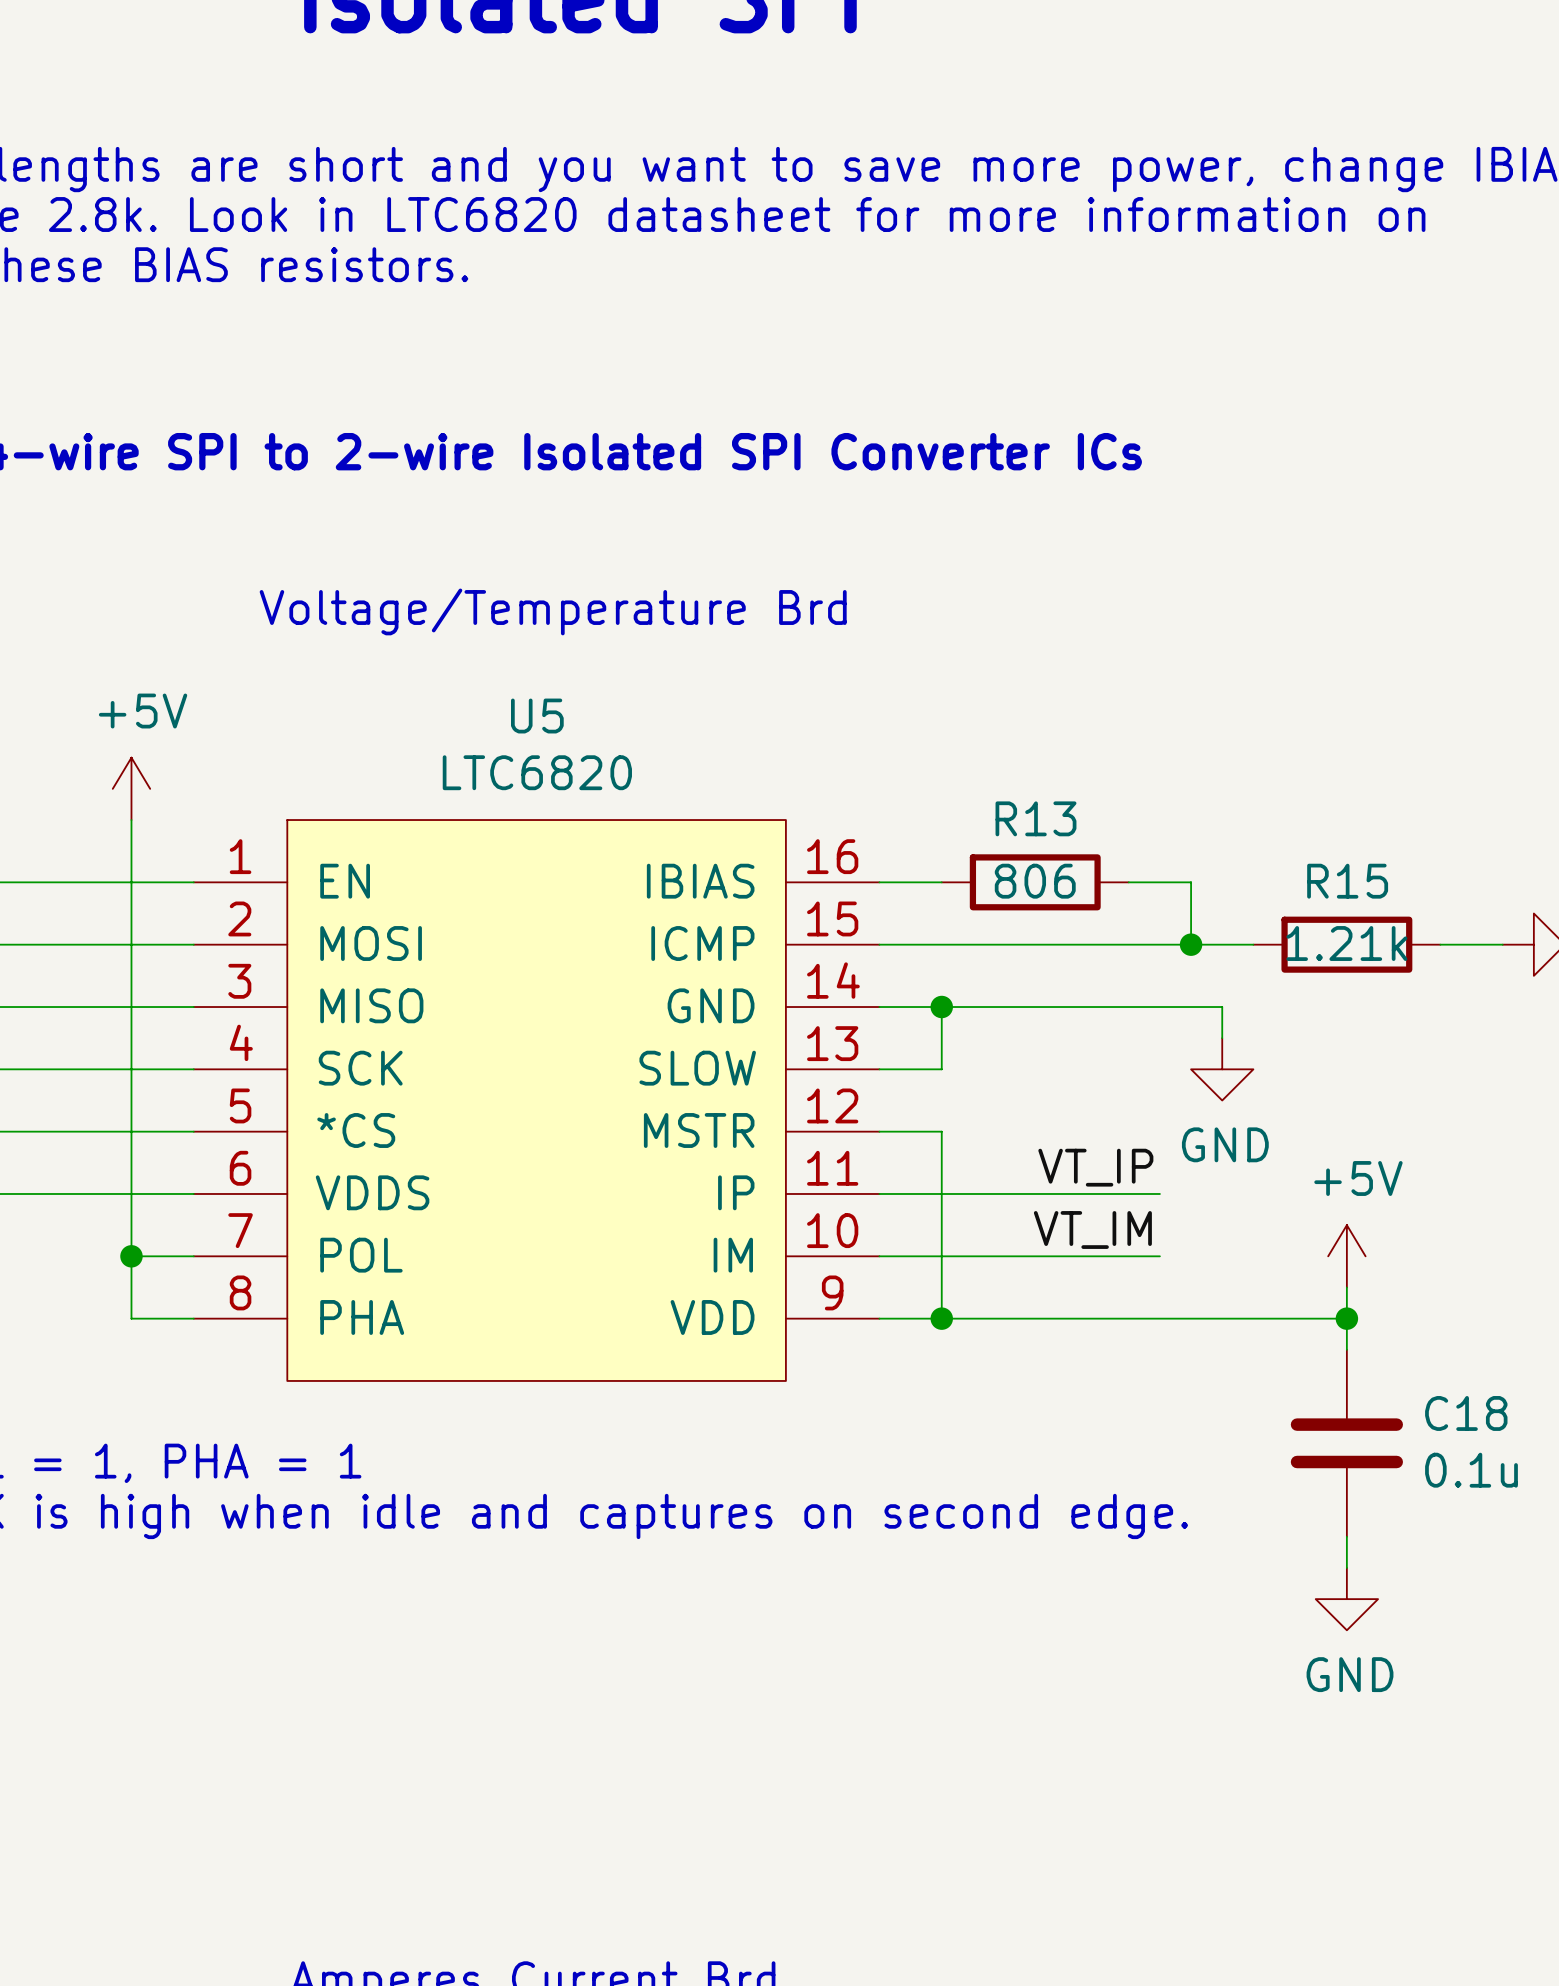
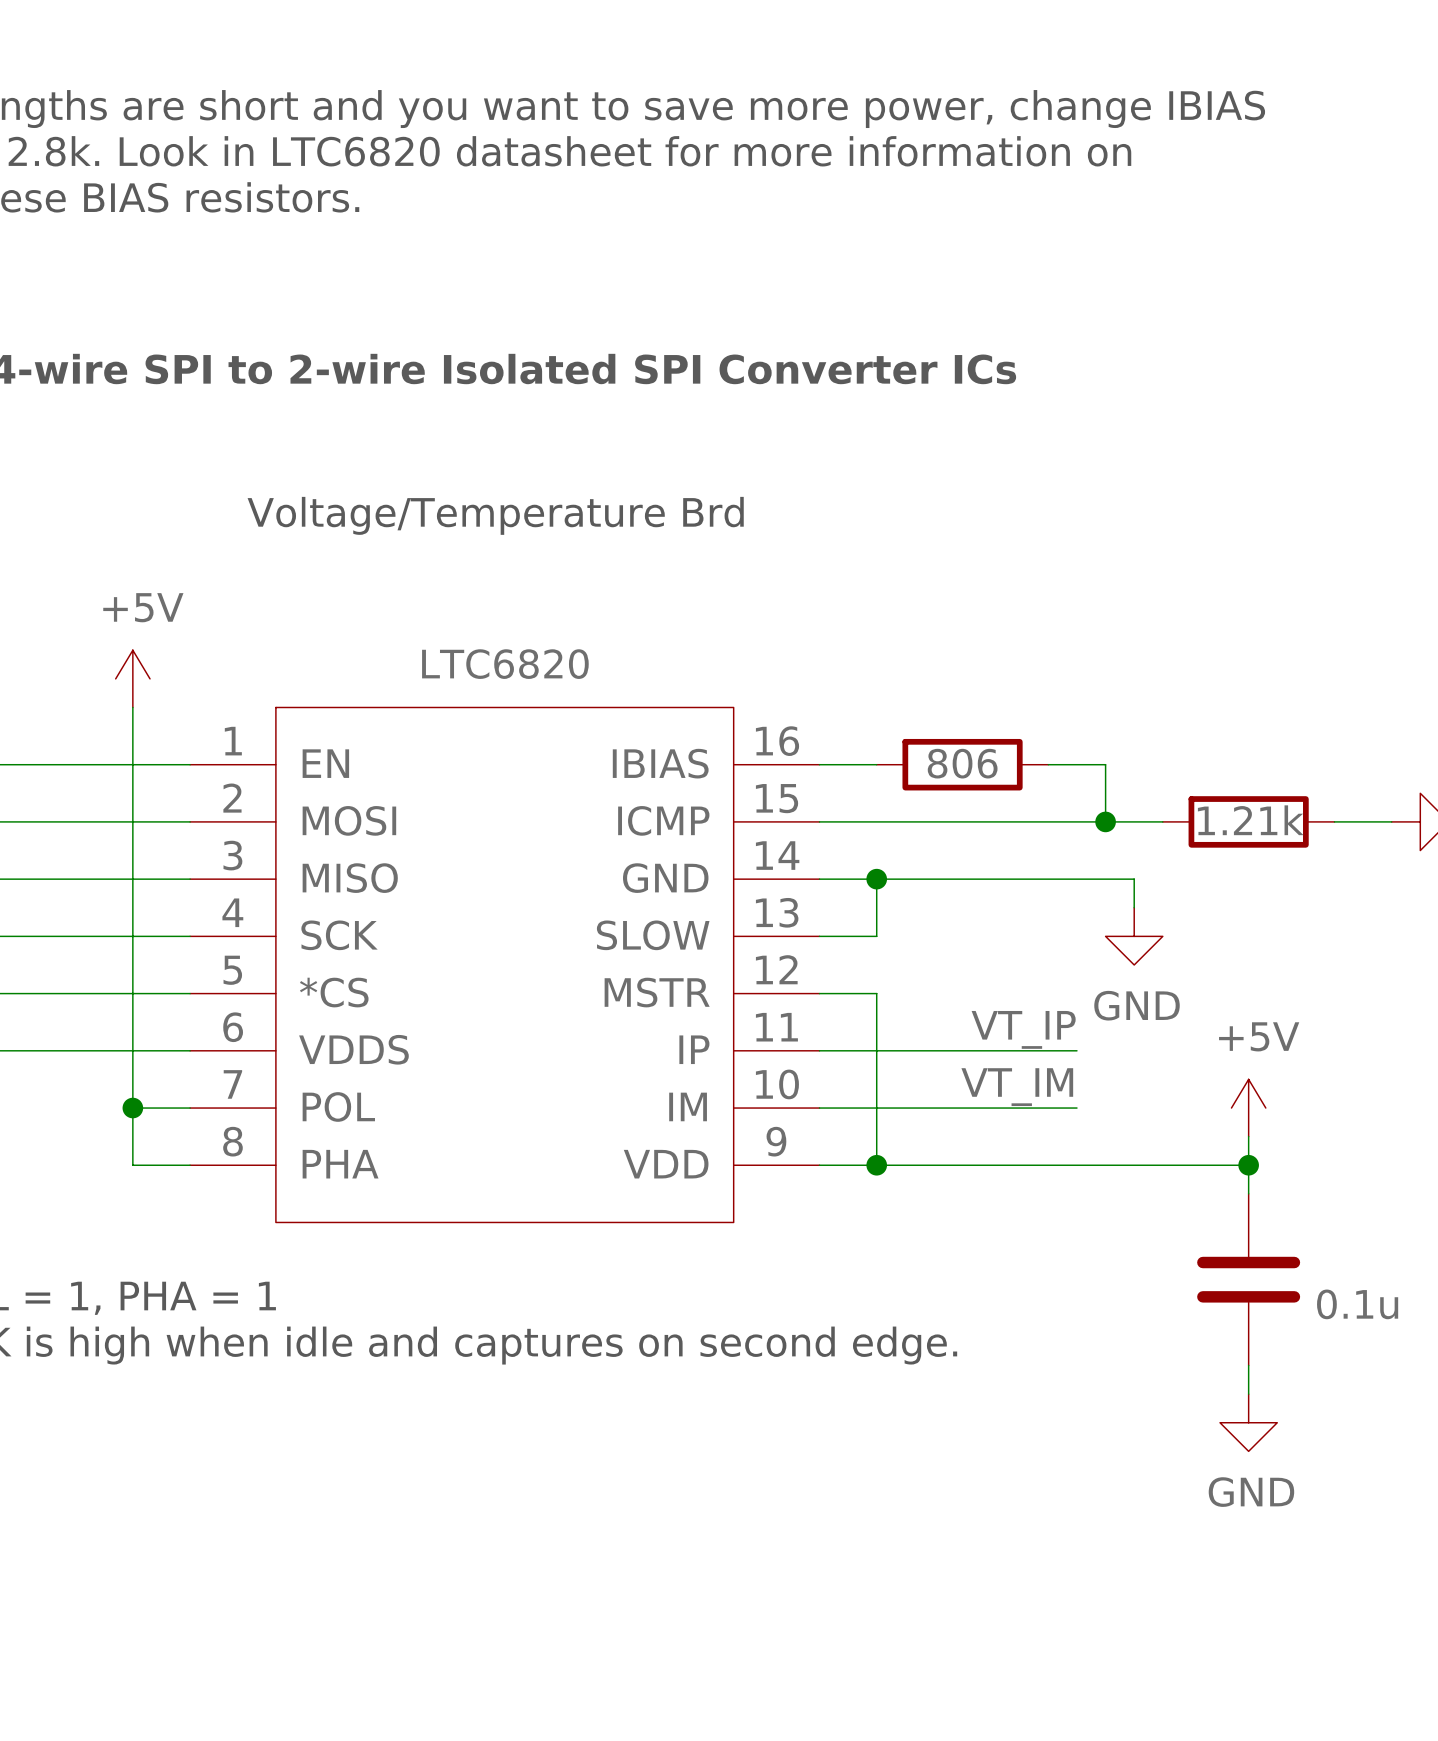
U5 name: U5 (537, 716) -> none
R13 name: R13 (1035, 818) -> none
R15 name: R15 (1347, 881) -> none
C18 name: C18 (1466, 1413) -> none

